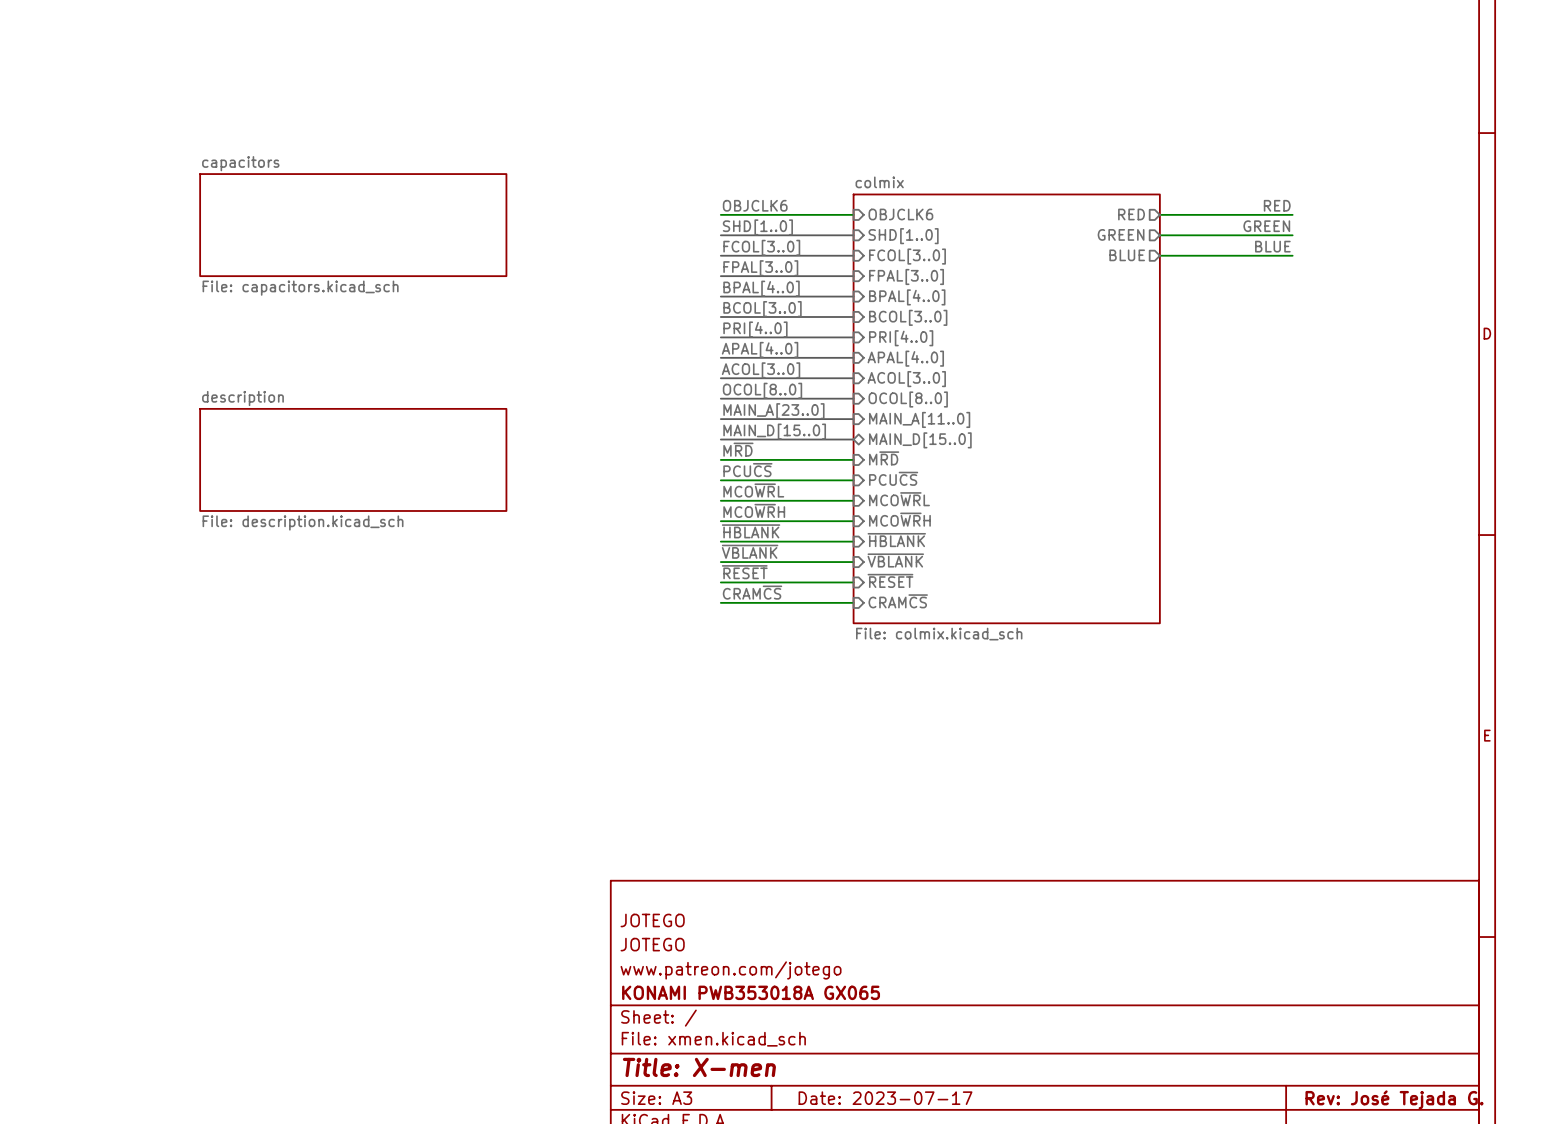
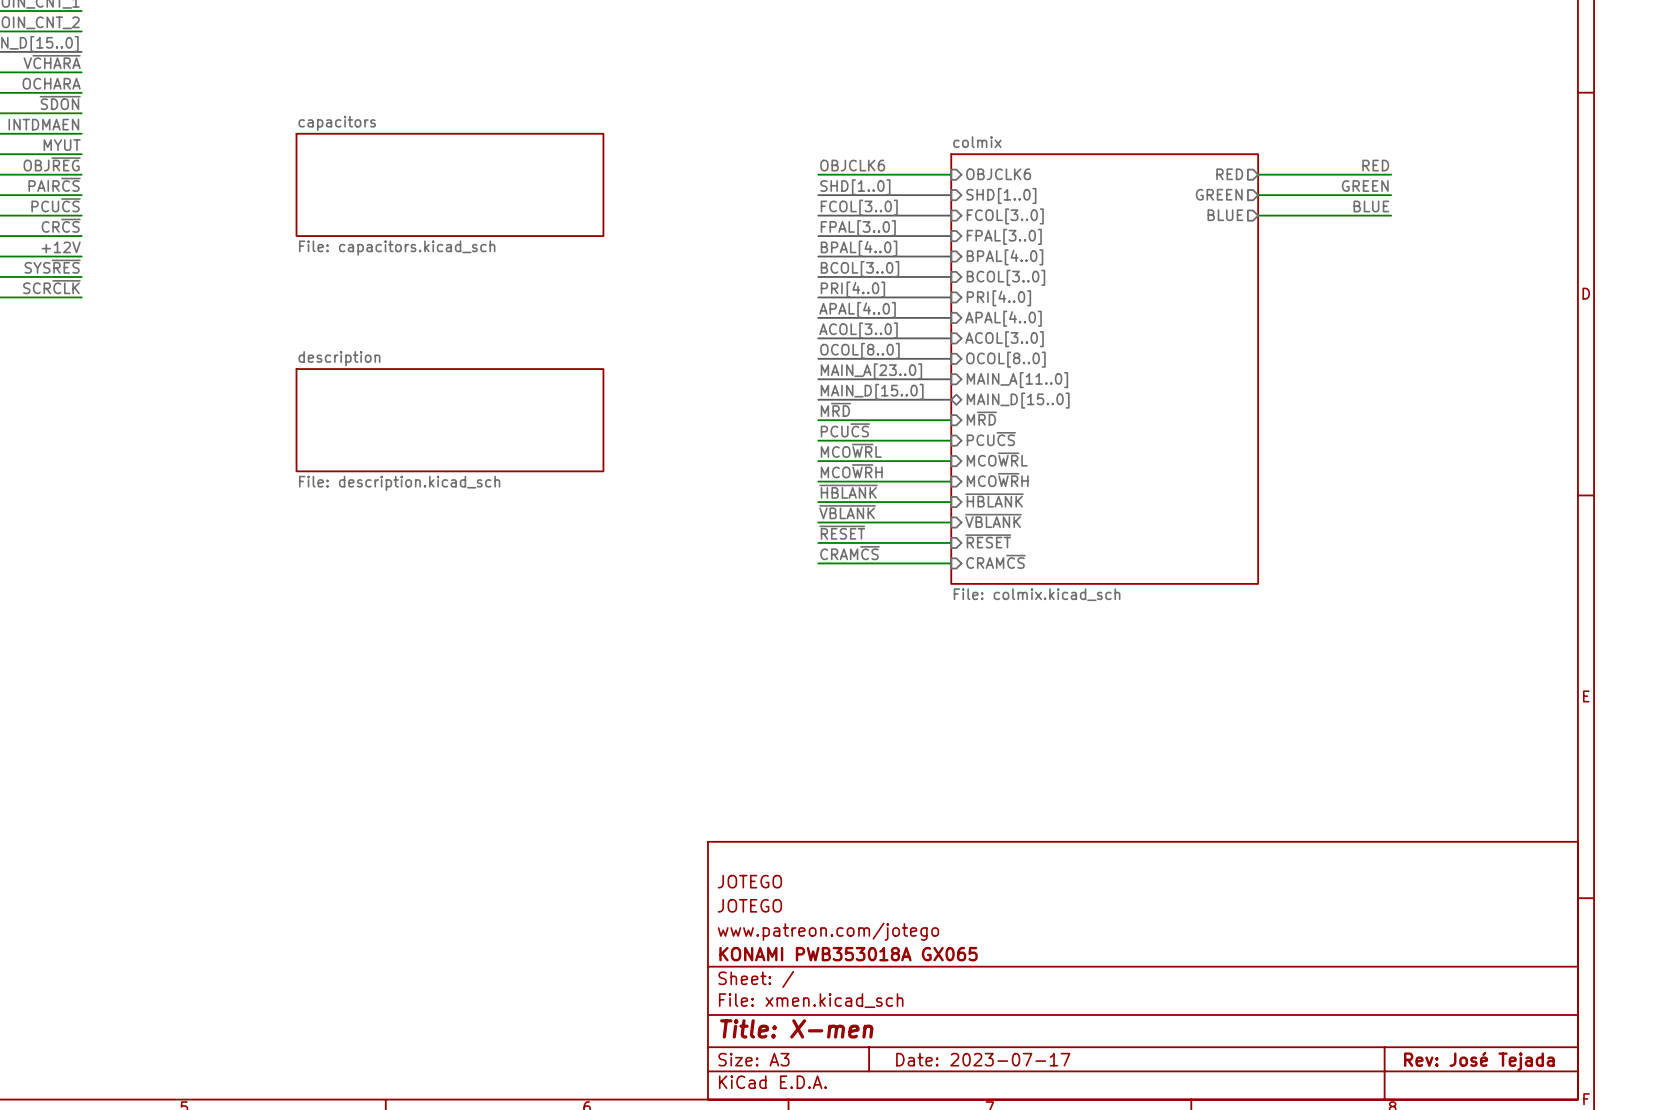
title block: Rev: José Tejada G. (1394, 1099) -> Rev: José Tejada (1479, 1061)

